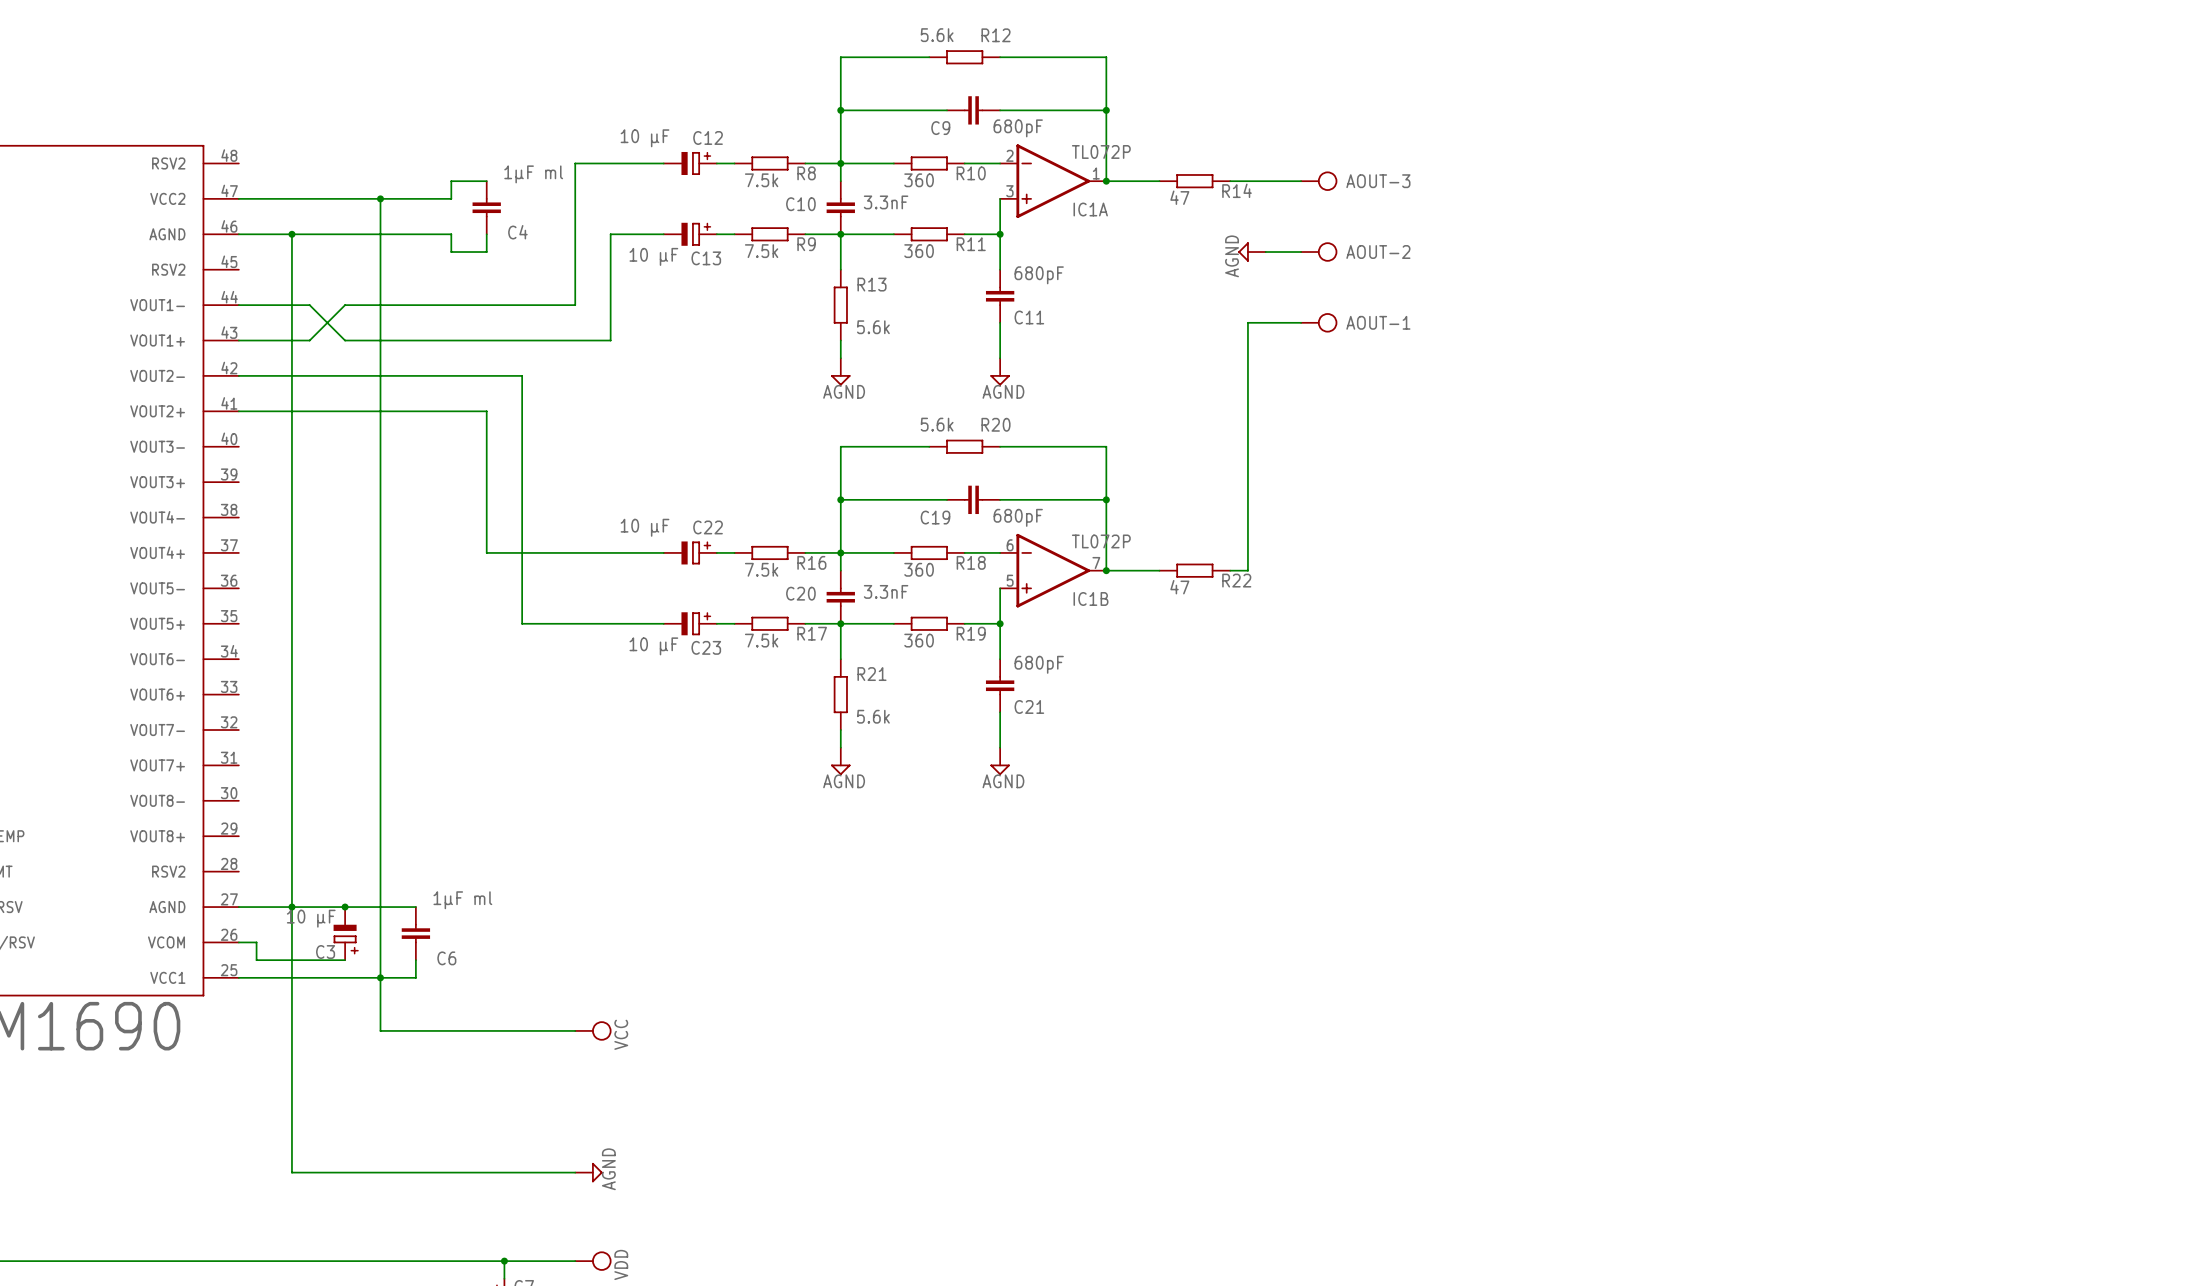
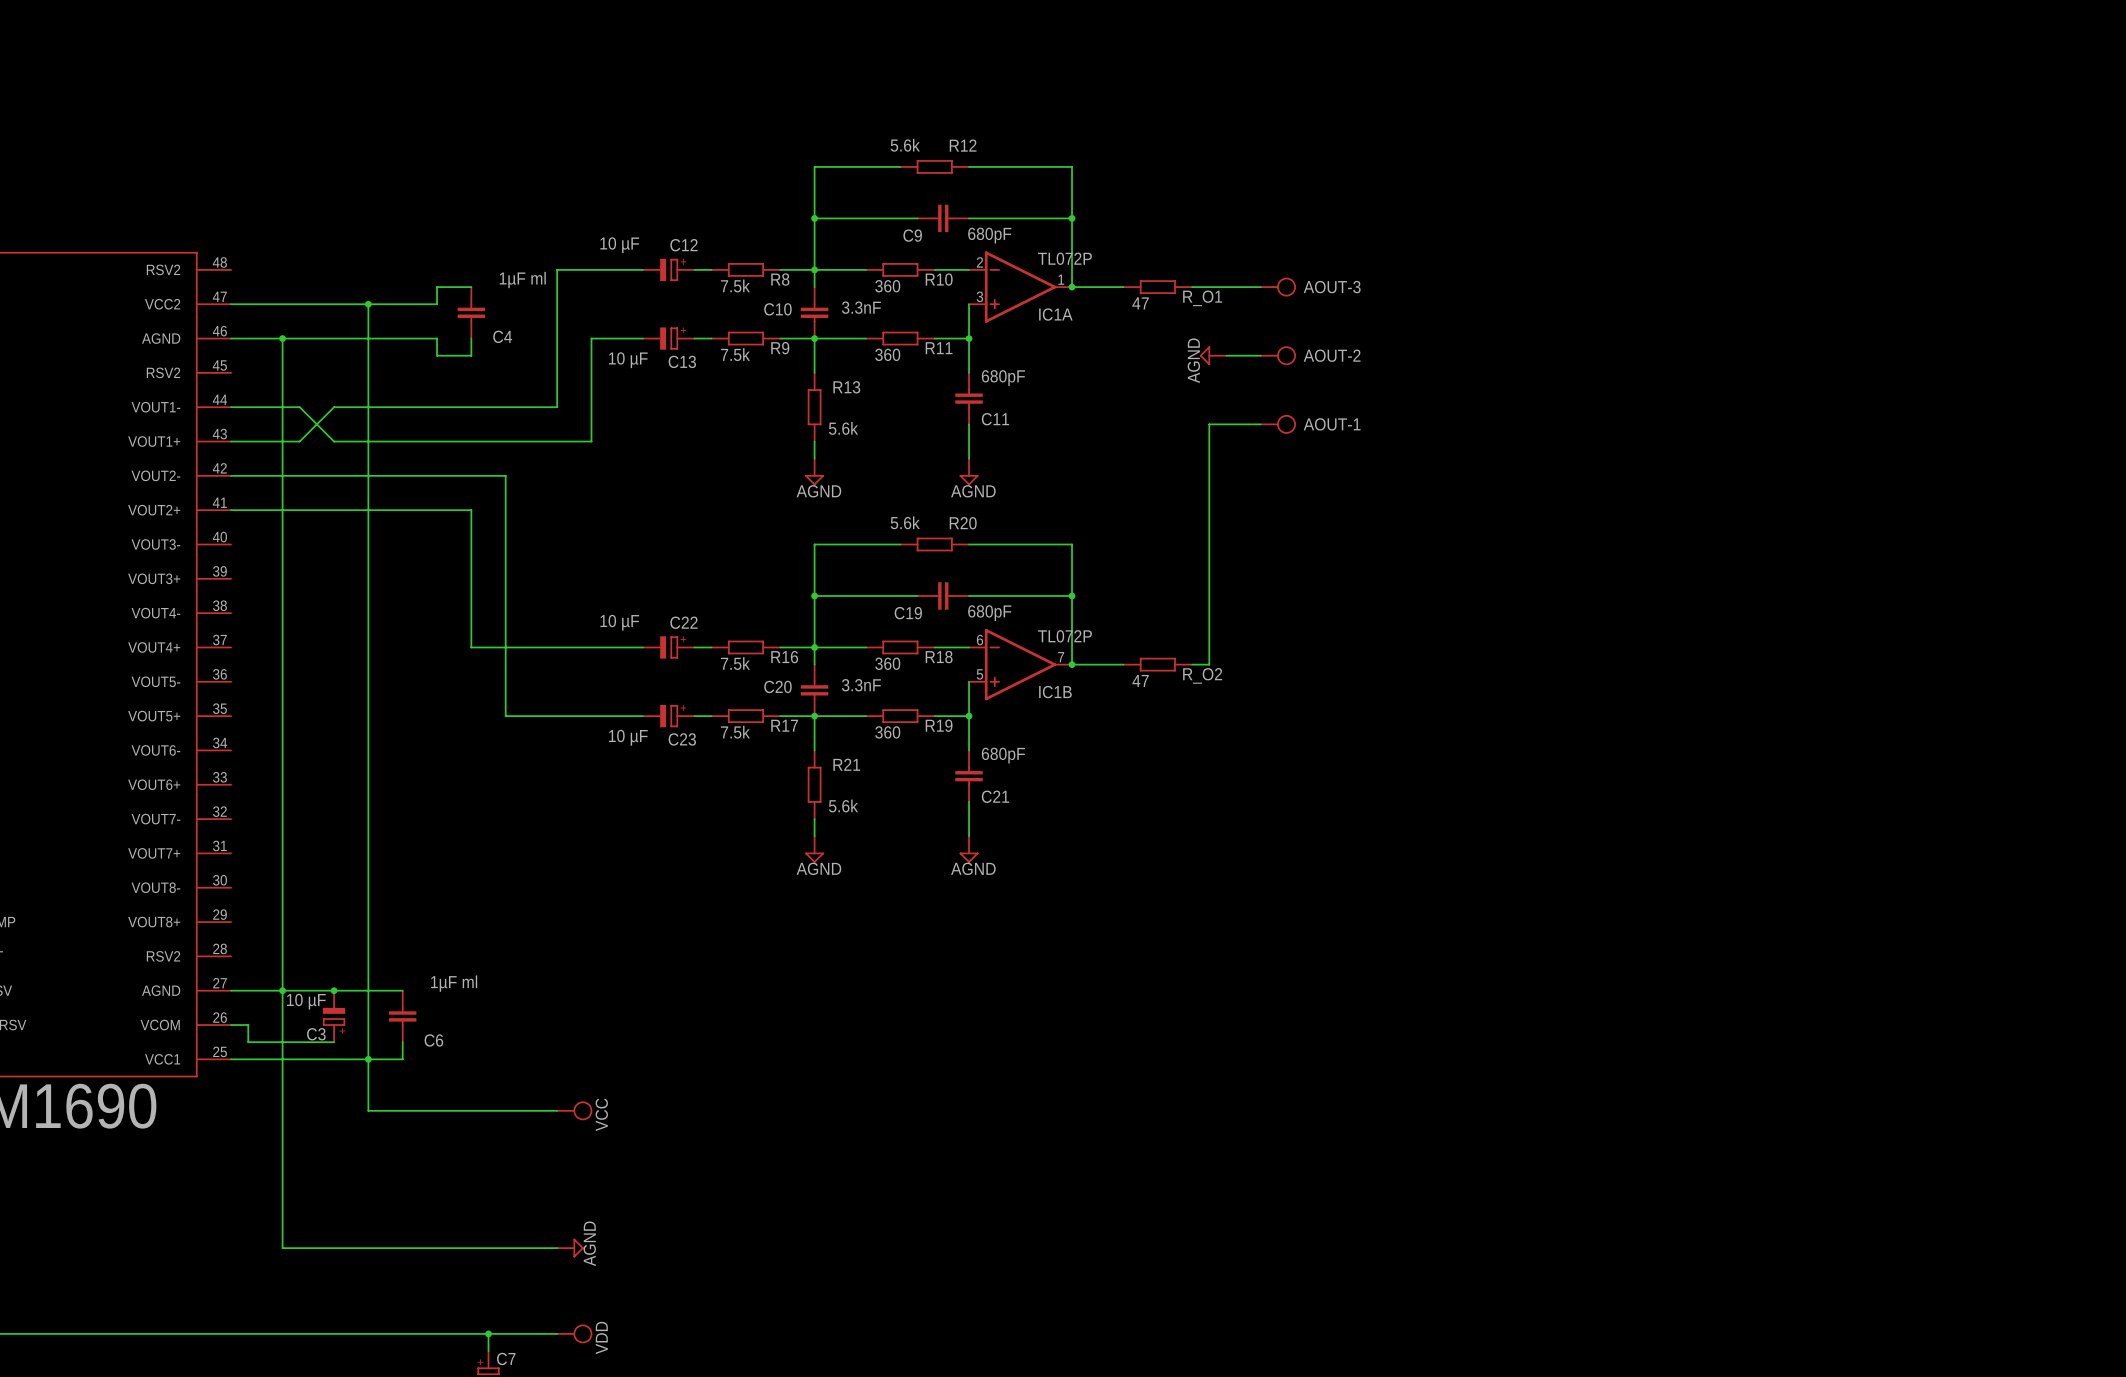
R14 name: R14 (1237, 190) -> R_O1 (1202, 298)
R22 name: R22 (1236, 580) -> R_O2 (1202, 675)

